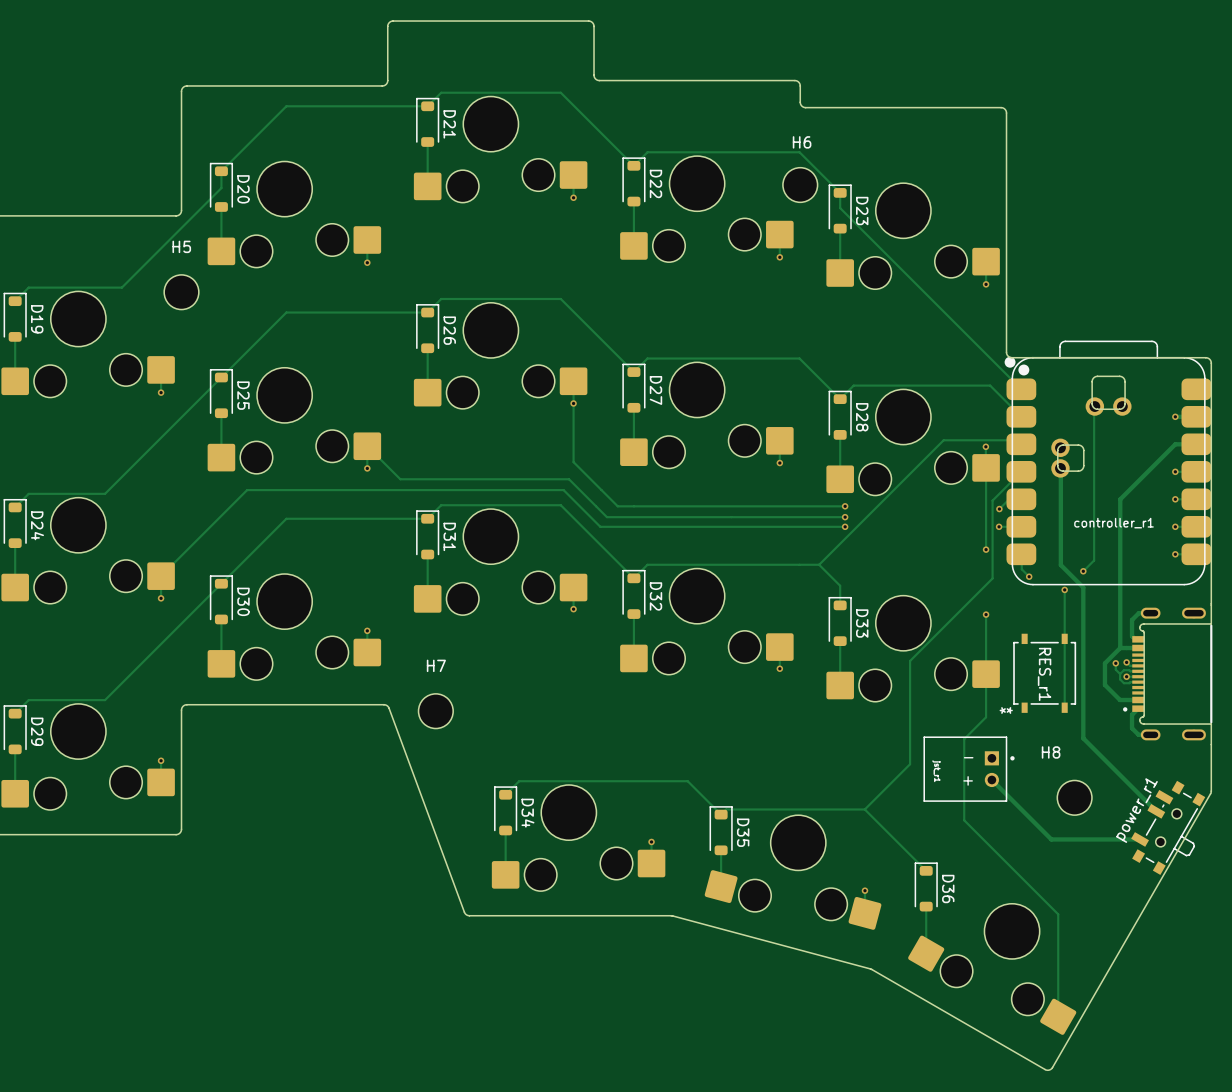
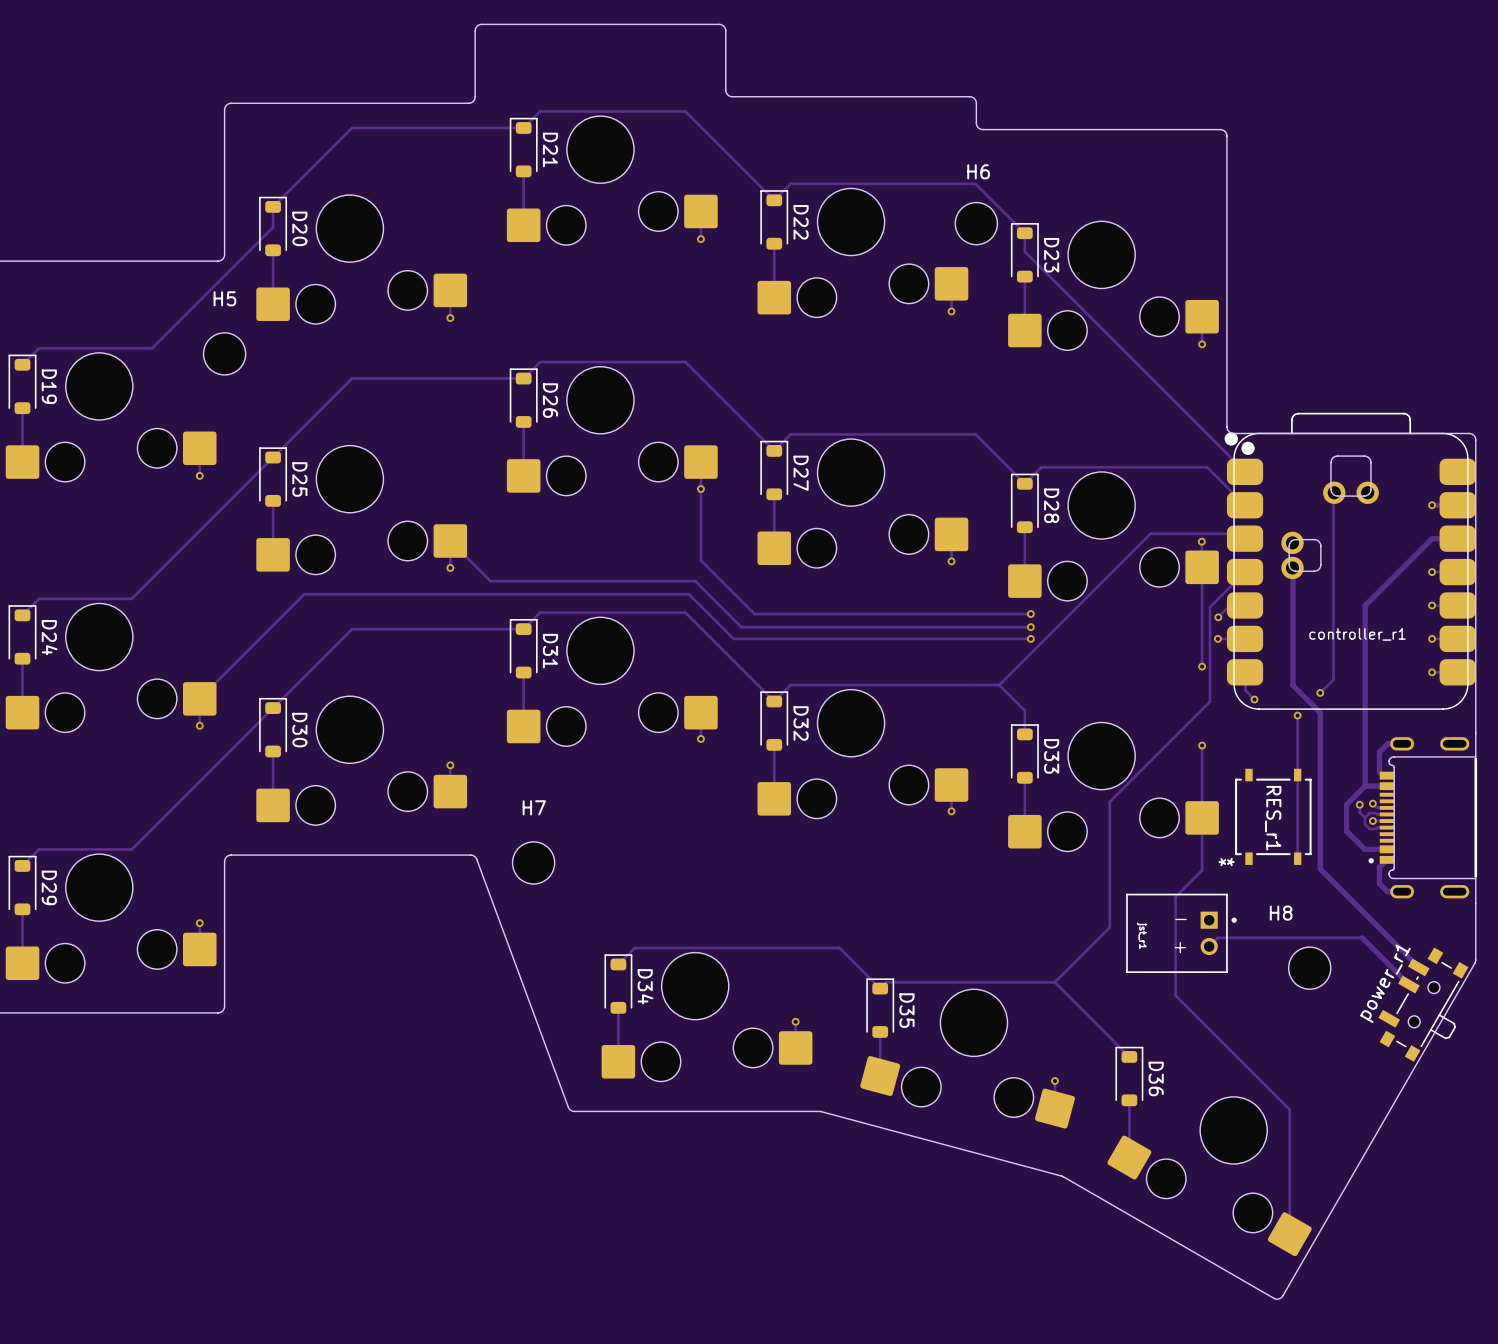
track: (1083, 716) (1083, 738) (1117, 772) -> (1320, 868) (1418, 967)
track: (991, 779) (1051, 839) (1140, 839) -> (1209, 946) (1217, 937) (1362, 937)

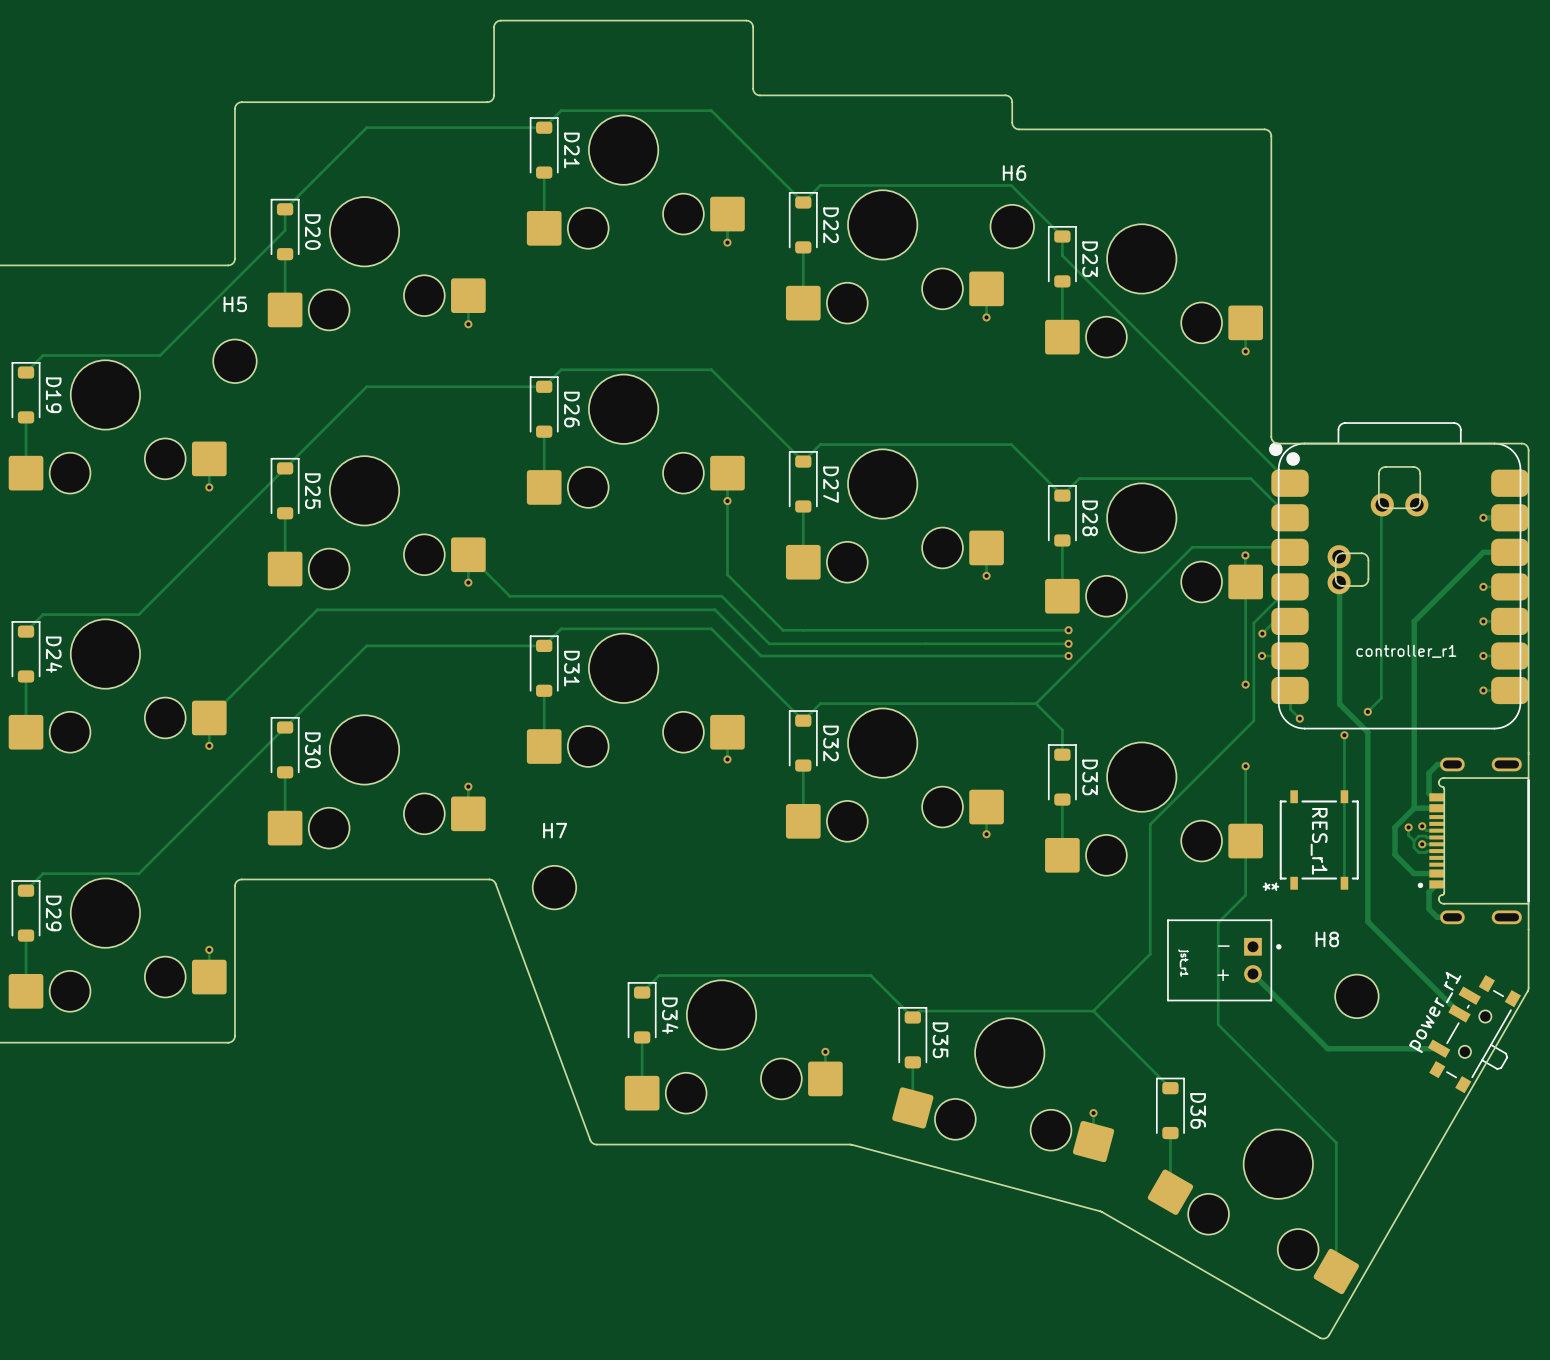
track: (1320, 868) (1418, 967) -> (1367, 893) (1367, 921) (1411, 965)
track: (1362, 937) (1217, 937) (1209, 946) -> (1439, 1048) (1327, 1048) (1252, 973)

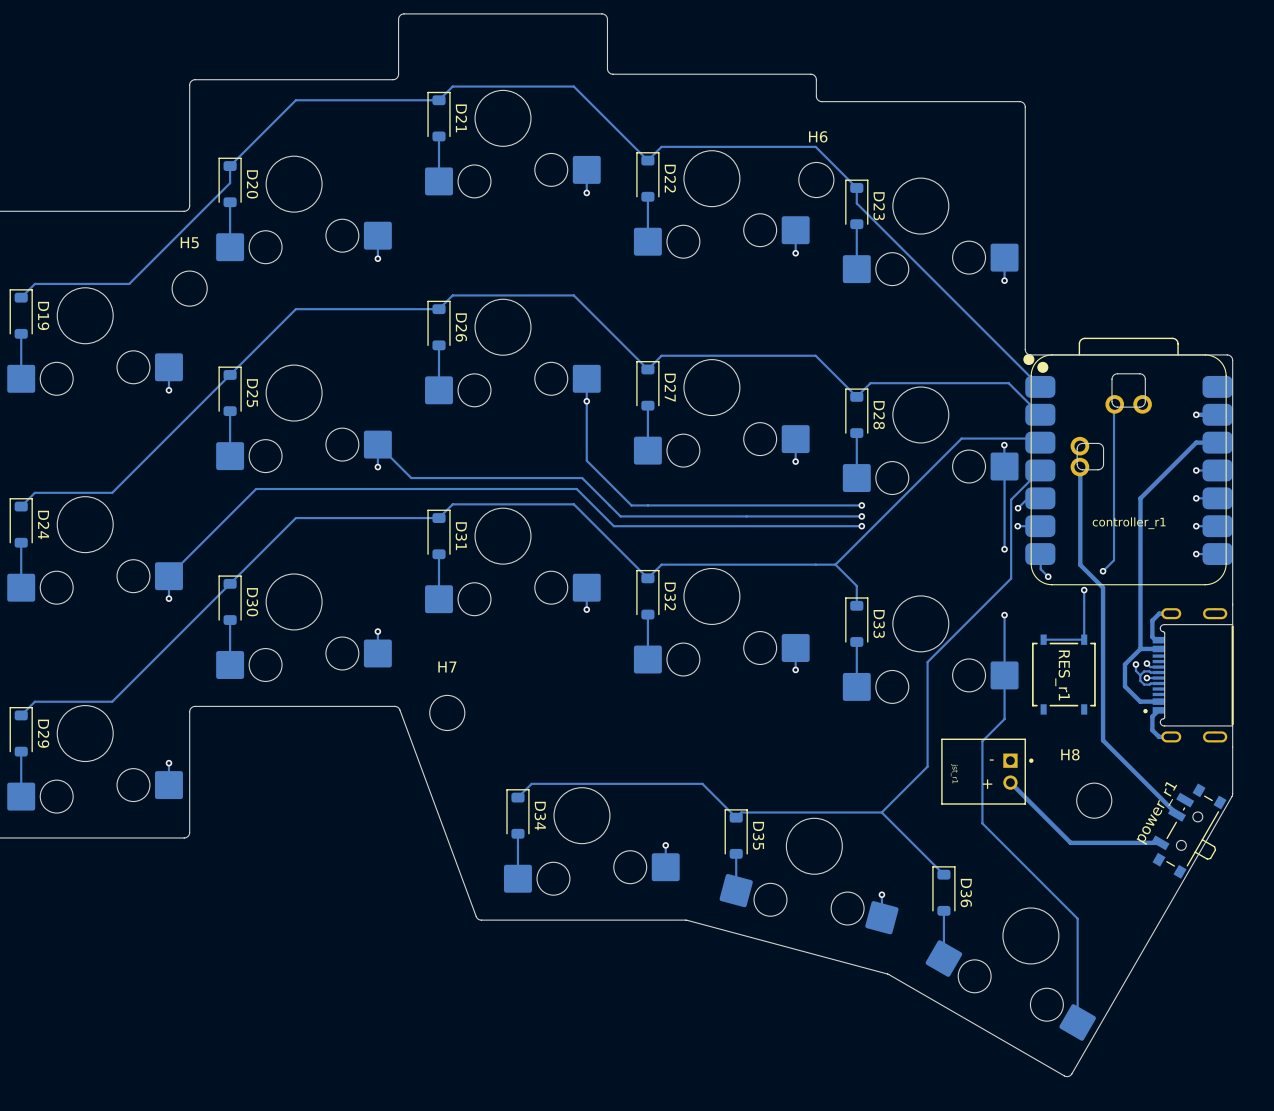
RES_r1 footprint: [1279, 790, 1359, 890] -> [1032, 634, 1096, 715]
track: (1344, 796) (1344, 883) -> (1084, 639) (1043, 639)

